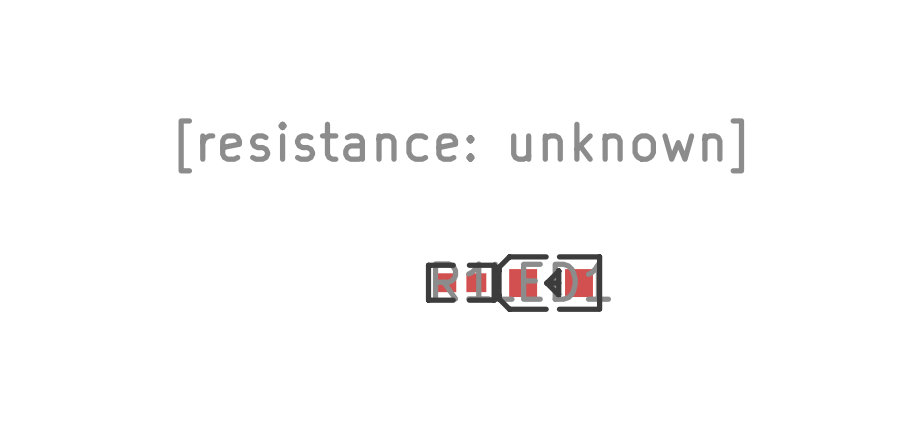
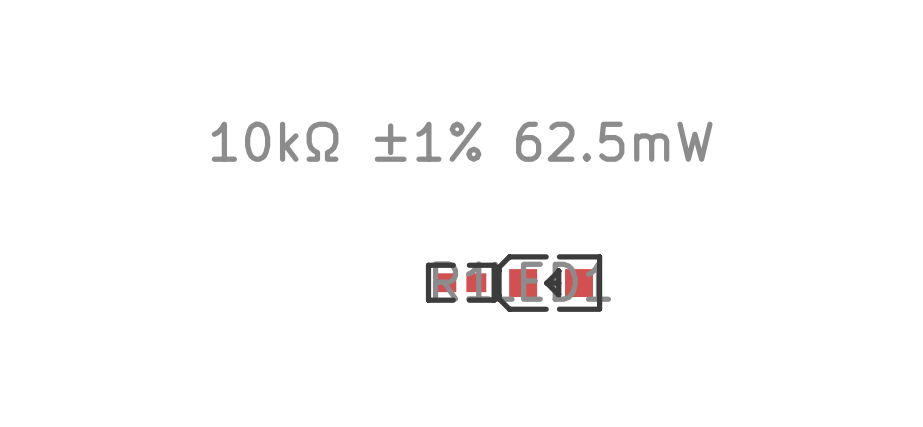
part value: [resistance: unknown] (461, 145) -> 10kΩ ±1% 62.5mW (462, 141)

